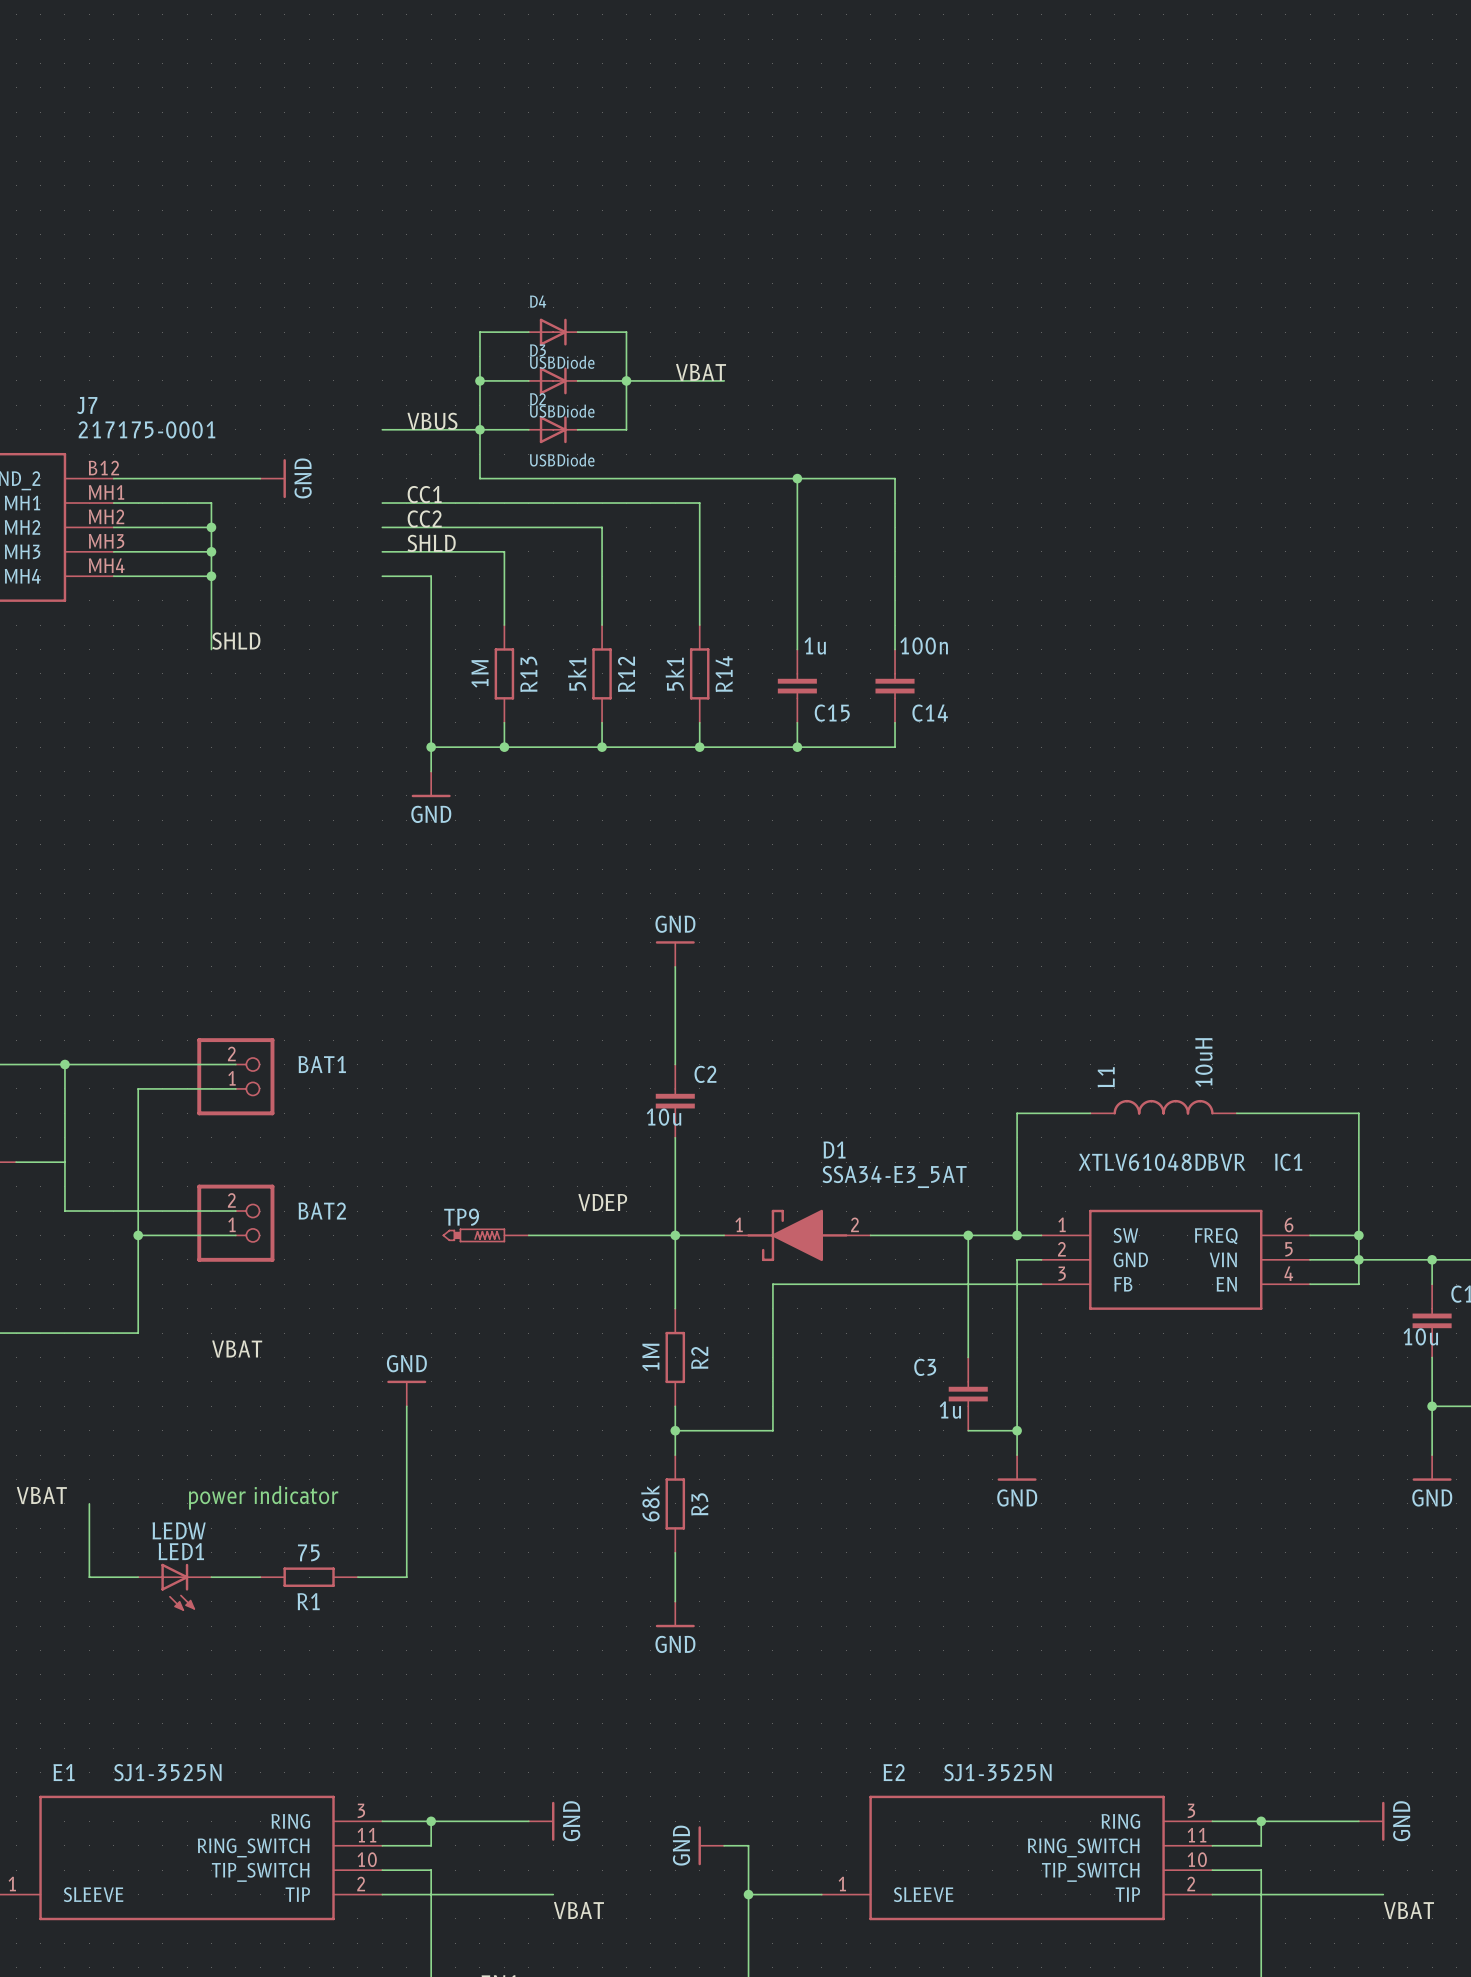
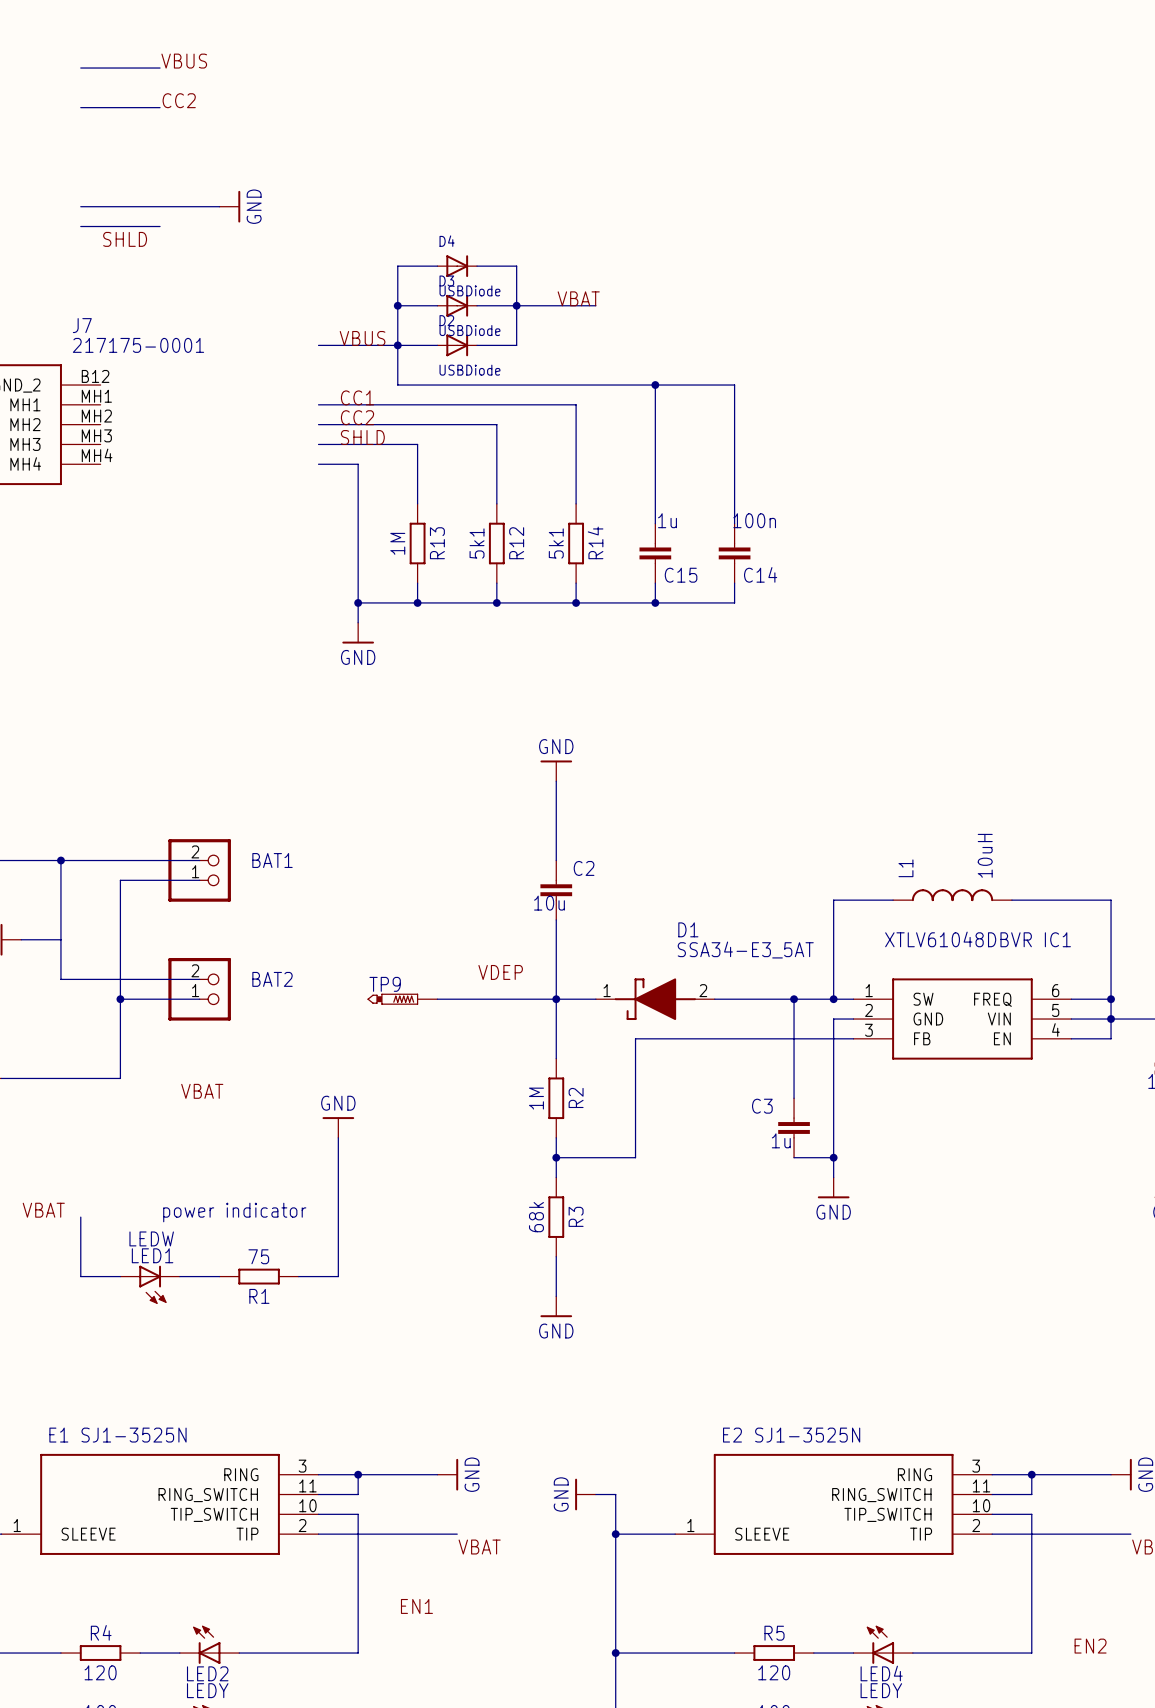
label: none -> VBUS (184, 61)
wire: none -> (80, 68) (160, 68)
label: none -> CC2 (179, 100)
wire: none -> (80, 107) (160, 107)
wire: none -> (80, 206) (219, 206)
wire: none -> (80, 226) (160, 226)
label: none -> SHLD (125, 239)
wire: (113, 478) (260, 478) -> none
power symbol position: GND (273, 478) -> GND (229, 206)
wire: (113, 503) (211, 503) (211, 649) -> none
wire: (113, 527) (211, 527) -> none
junction: (211, 527) -> none
wire: (113, 551) (211, 551) -> none
junction: (211, 551) -> none
wire: (113, 576) (211, 576) -> none
junction: (211, 576) -> none
label: SHLD (236, 641) -> none

